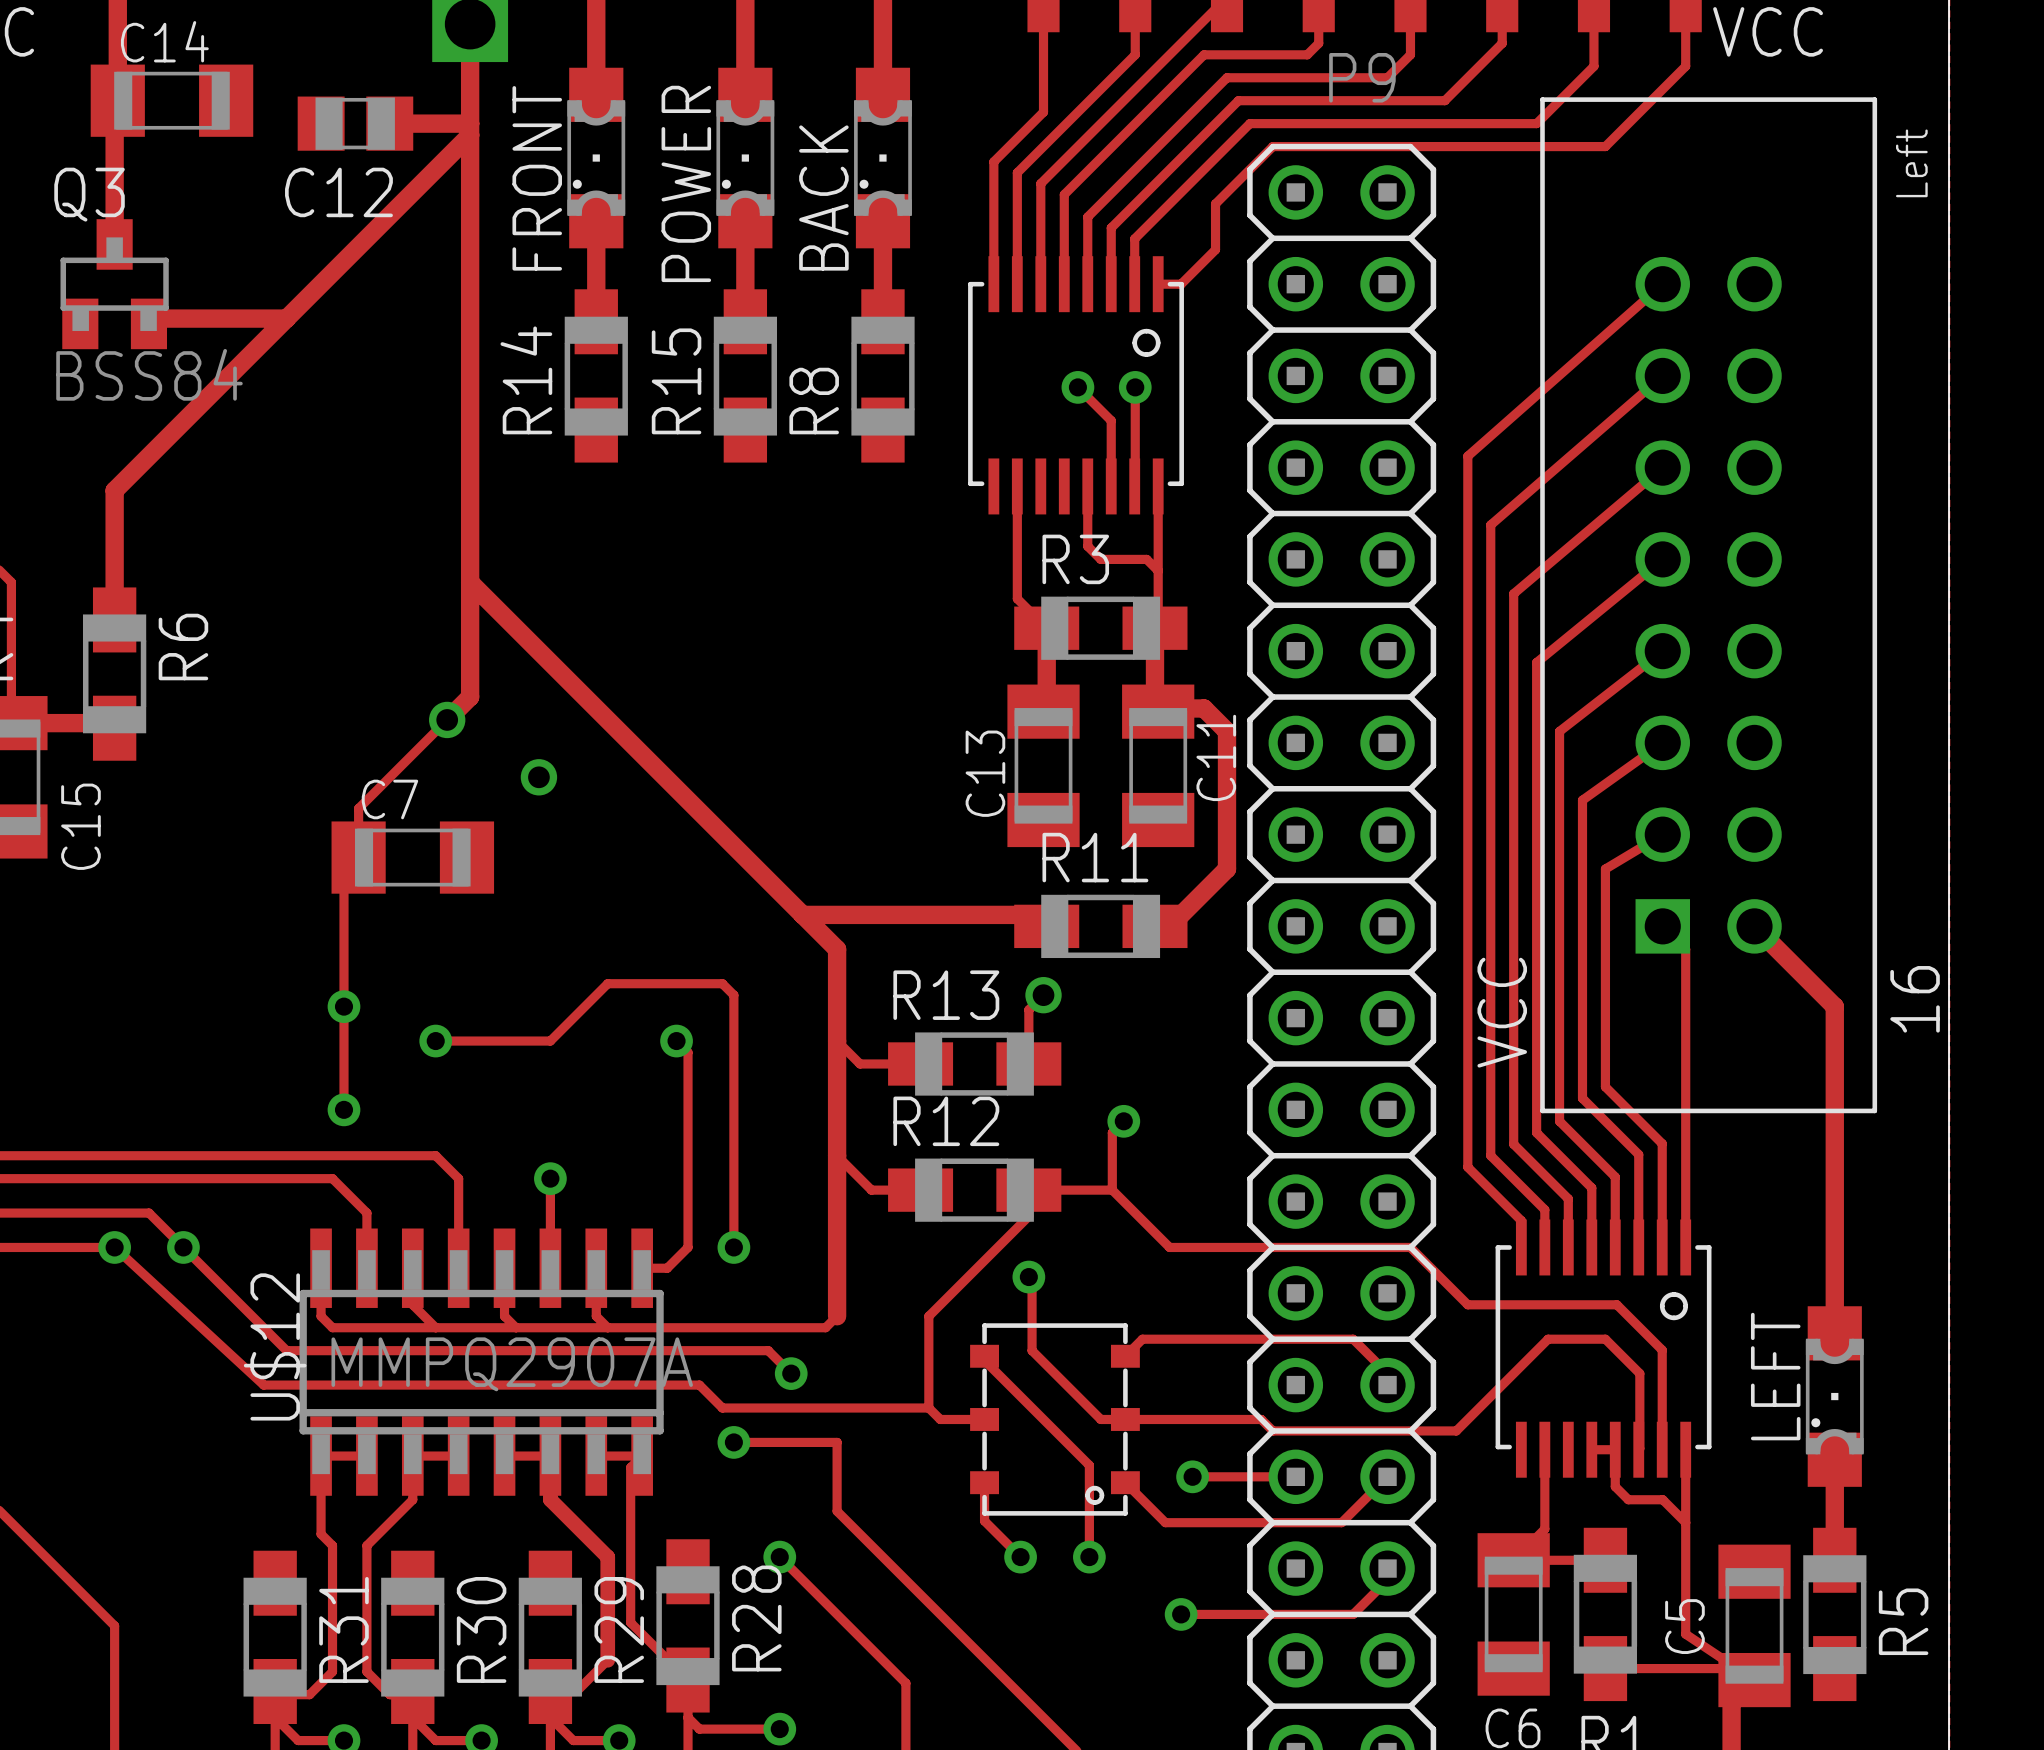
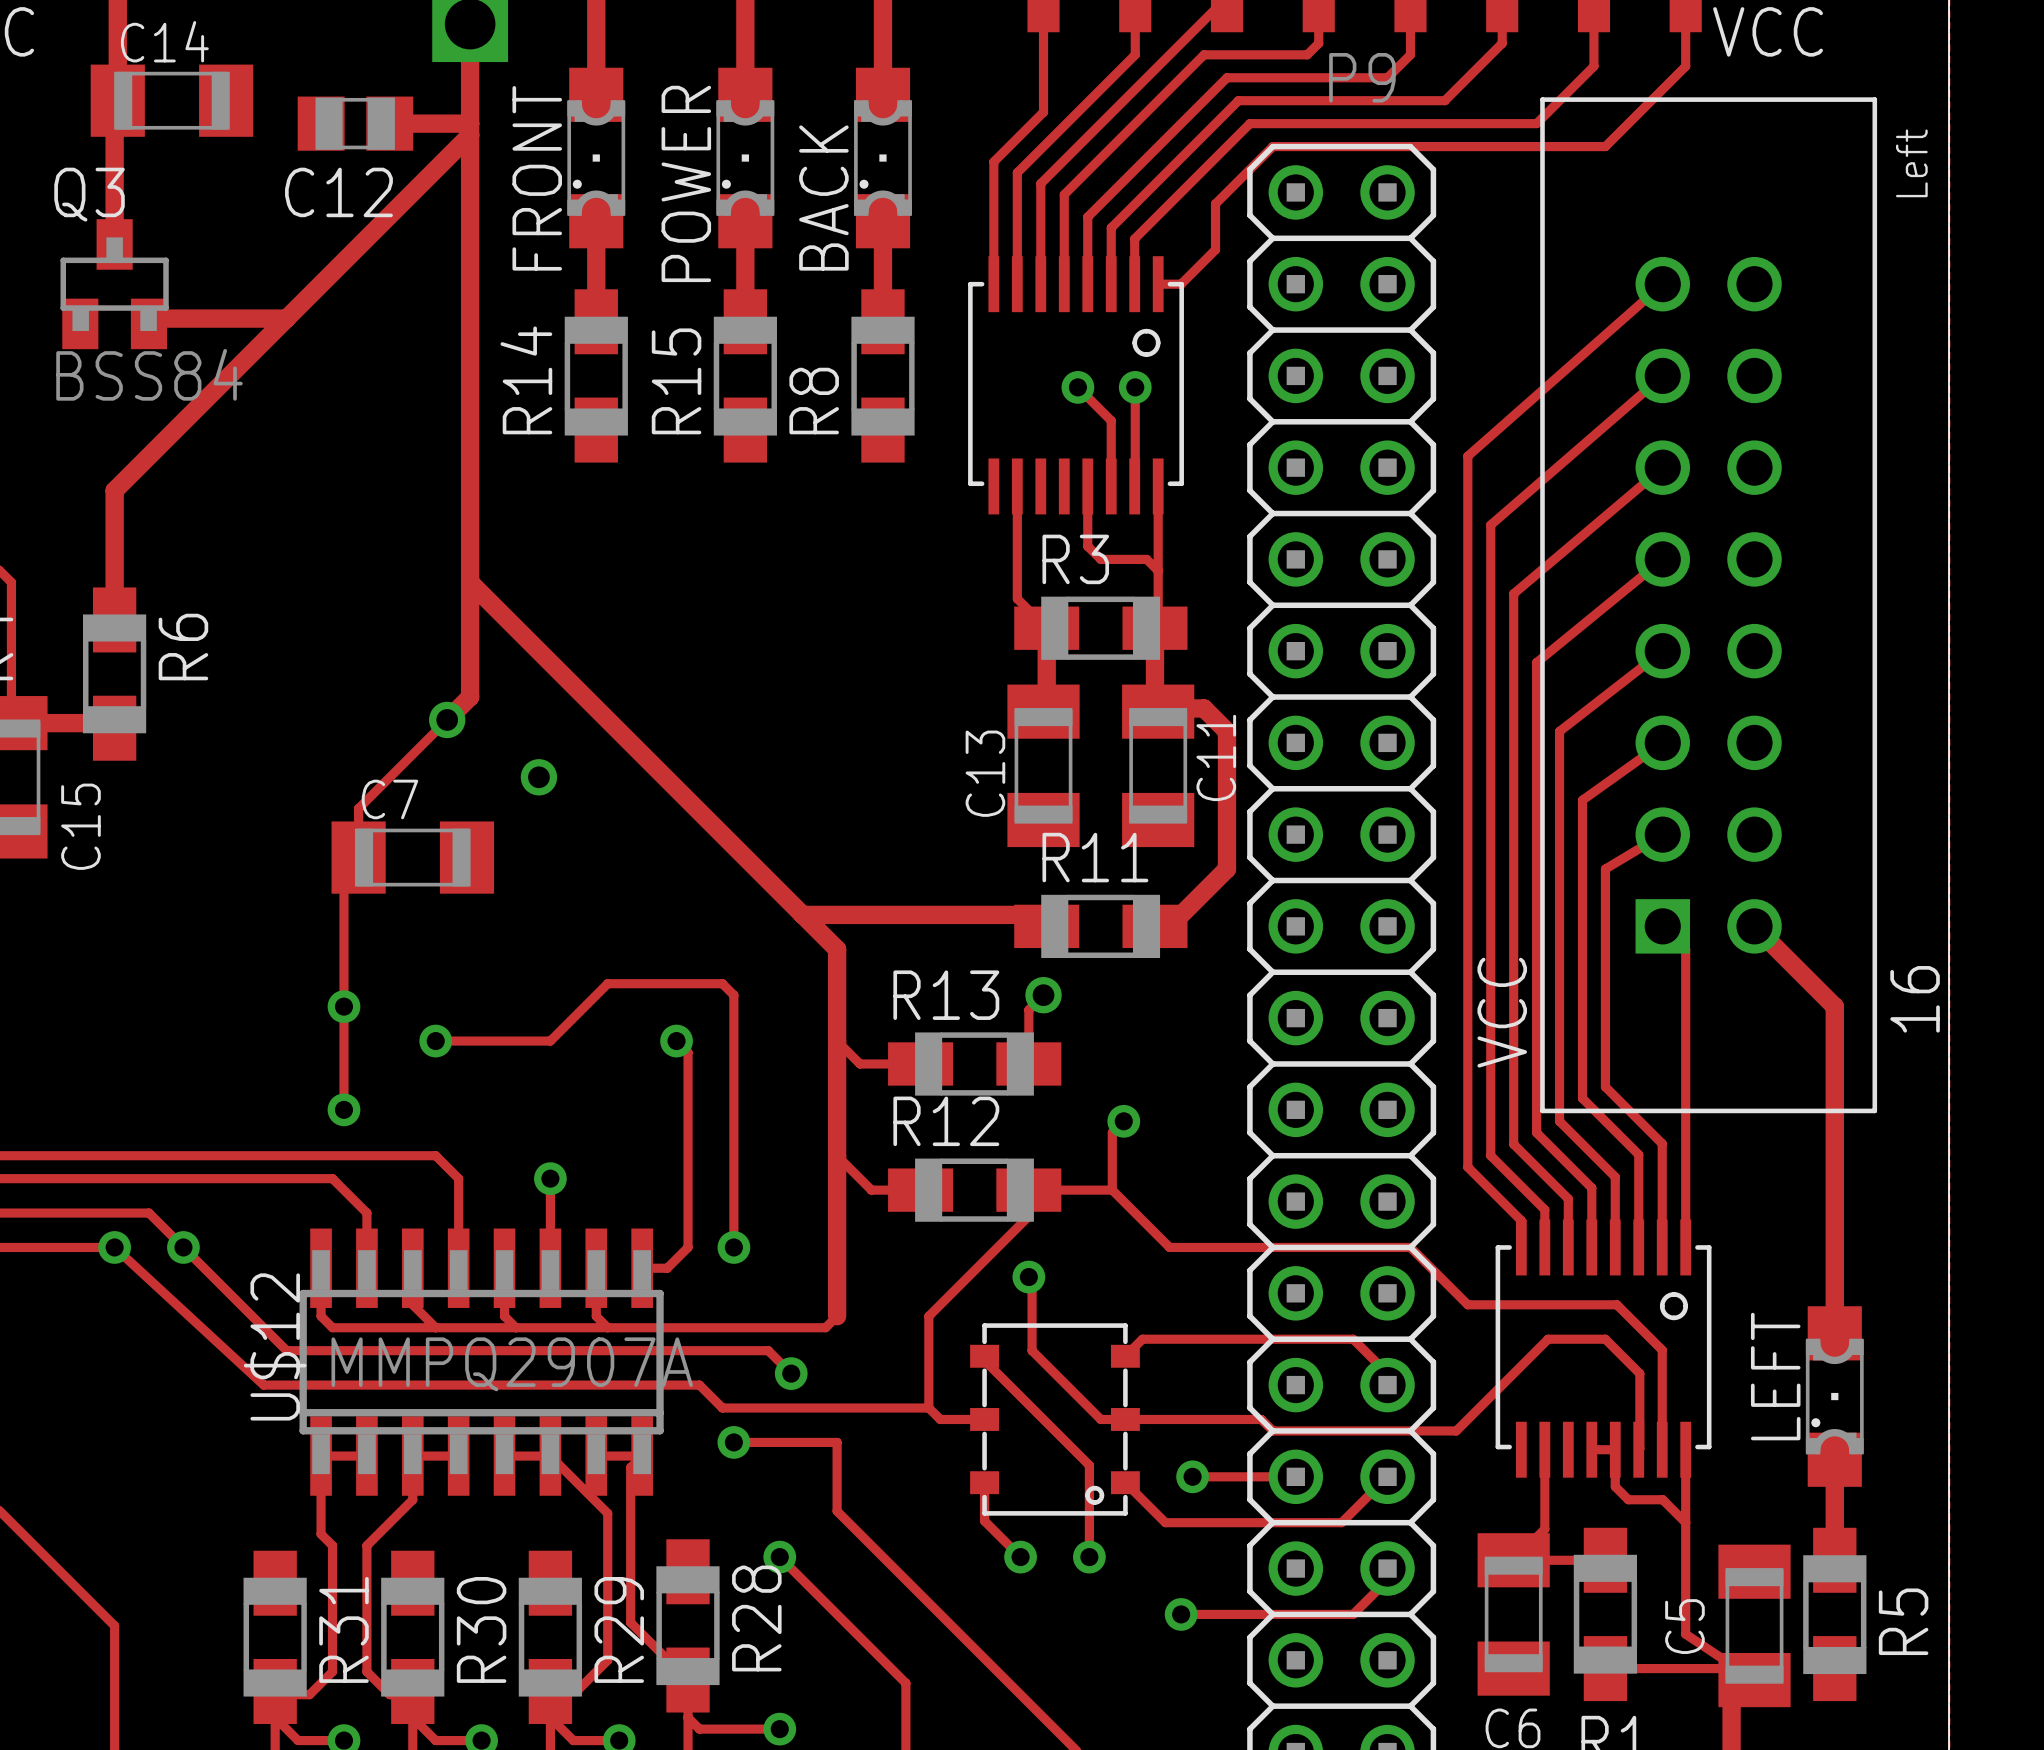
track: (550, 1456) (550, 1499) (607, 1557) -> (550, 1456) (607, 1513) (607, 1557)
track width: thick (607, 1557) (607, 1660) -> thin (607, 1557) (607, 1660)

